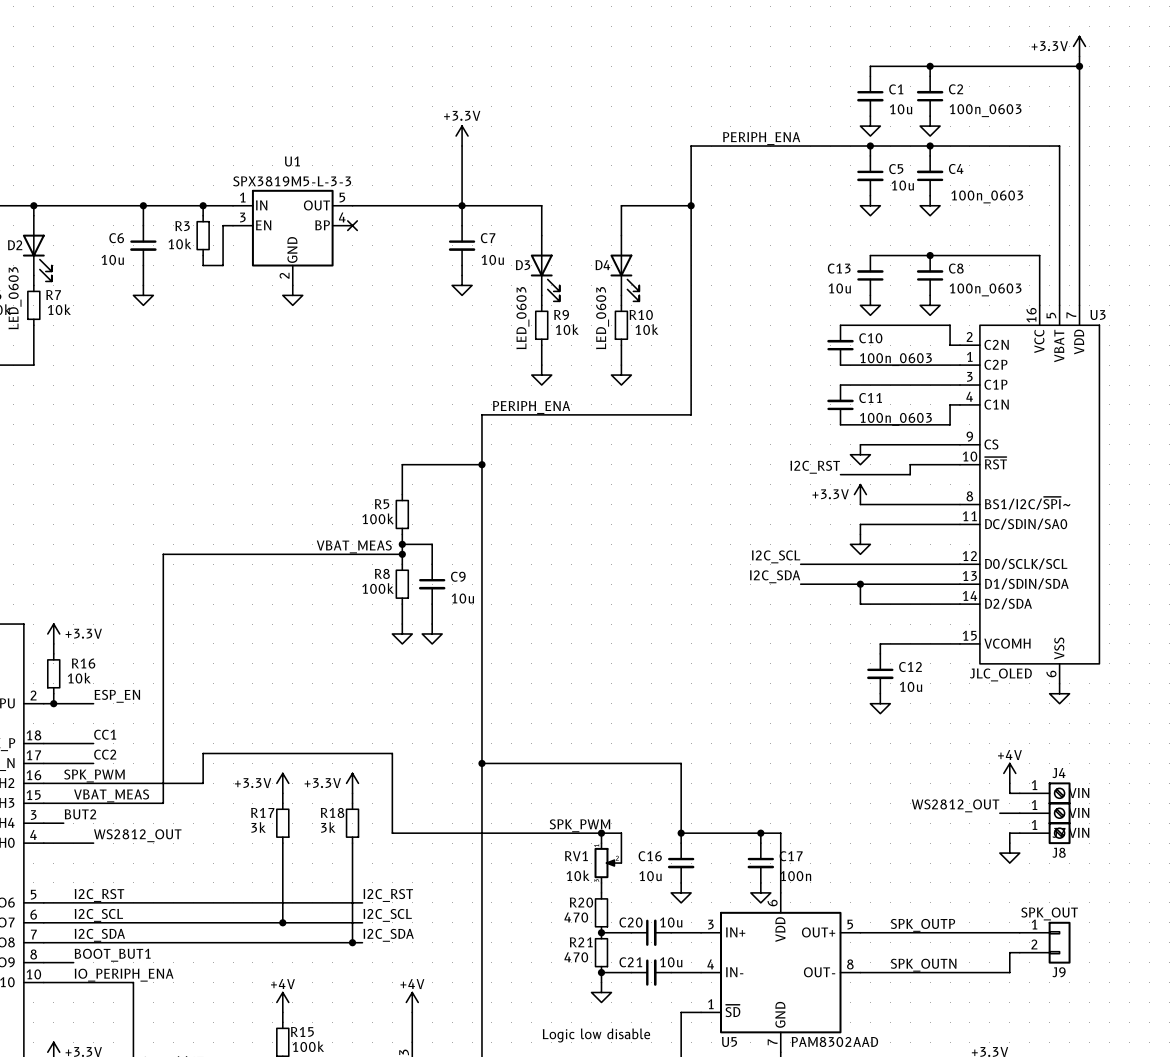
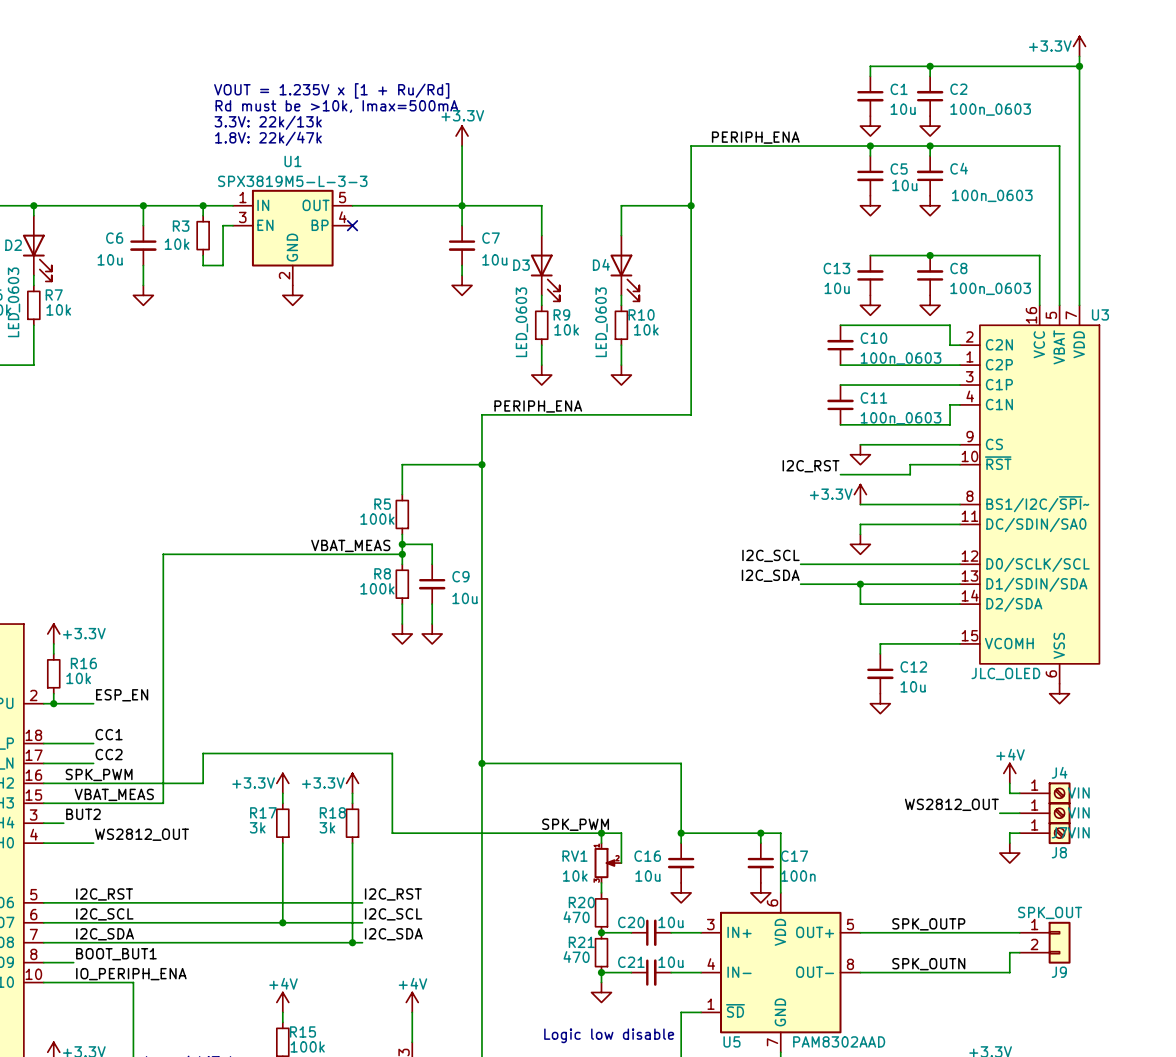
text: none -> VOUT = 1.235V x [1 + Ru/Rd] (331, 90)
text: none -> Rd must be >10k, Imax=500mA (336, 106)
text: none -> 3.3V: 22k/13k (268, 122)
text: none -> 1.8V: 22k/47k (268, 138)

